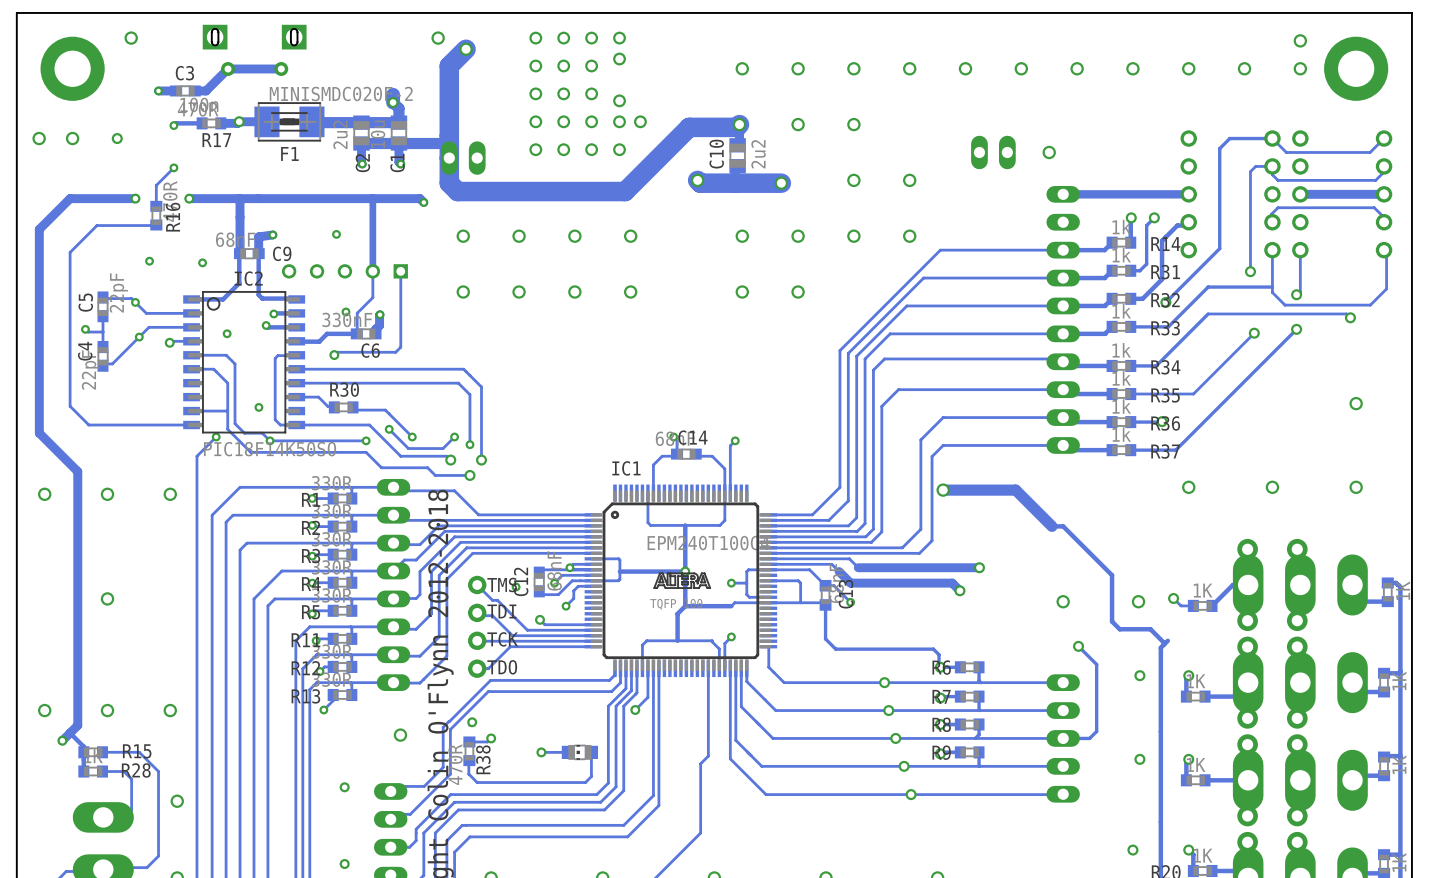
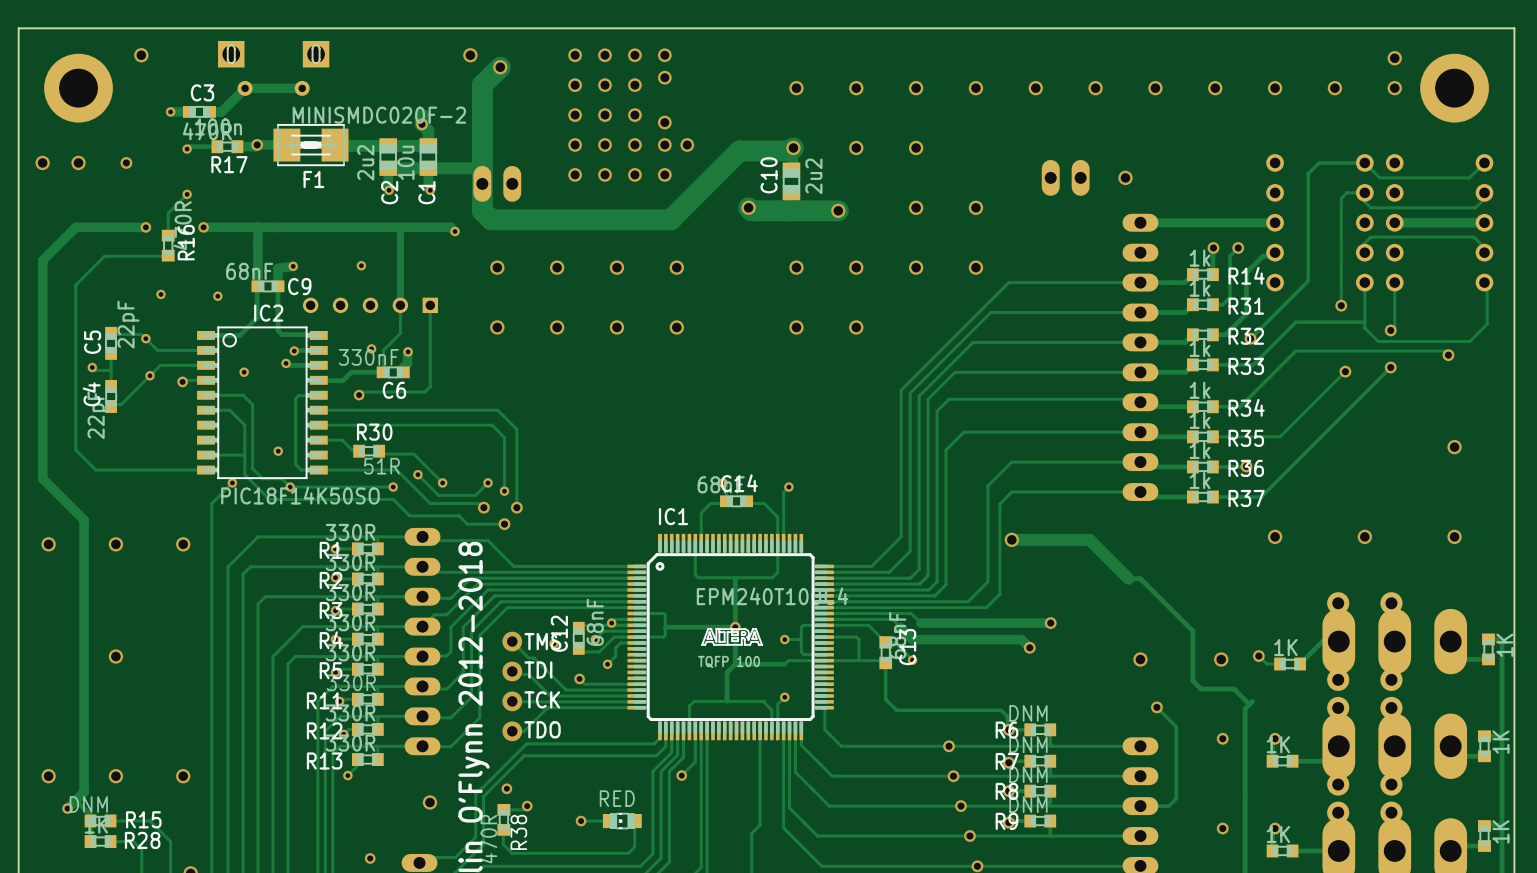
R30 value: none -> 51R (381, 466)
R11 value: none -> 330R (351, 682)
R6 value: none -> DNM (1028, 713)
R7 value: none -> DNM (1028, 744)
R8 value: none -> DNM (1028, 774)
part value: none -> RED (617, 798)
R15 value: none -> DNM (88, 804)
R9 value: none -> DNM (1028, 804)

